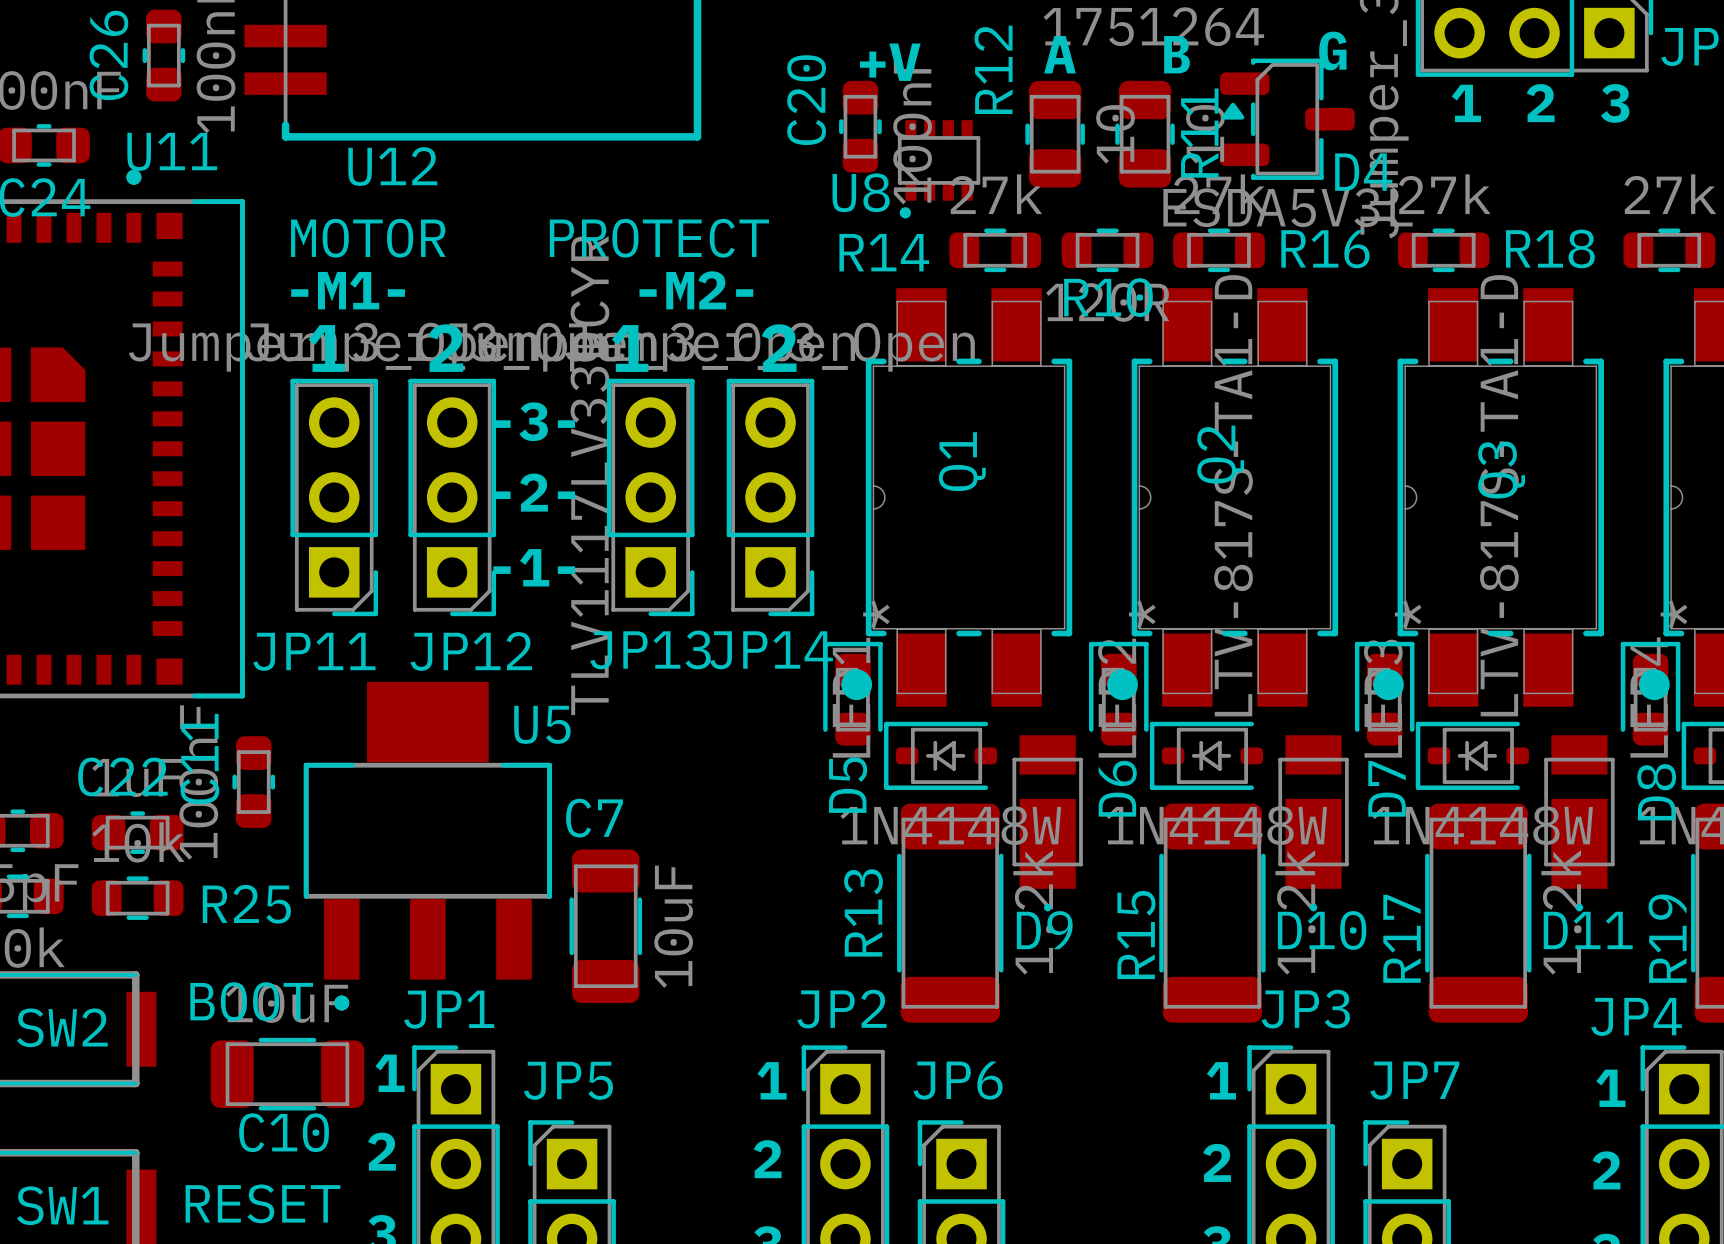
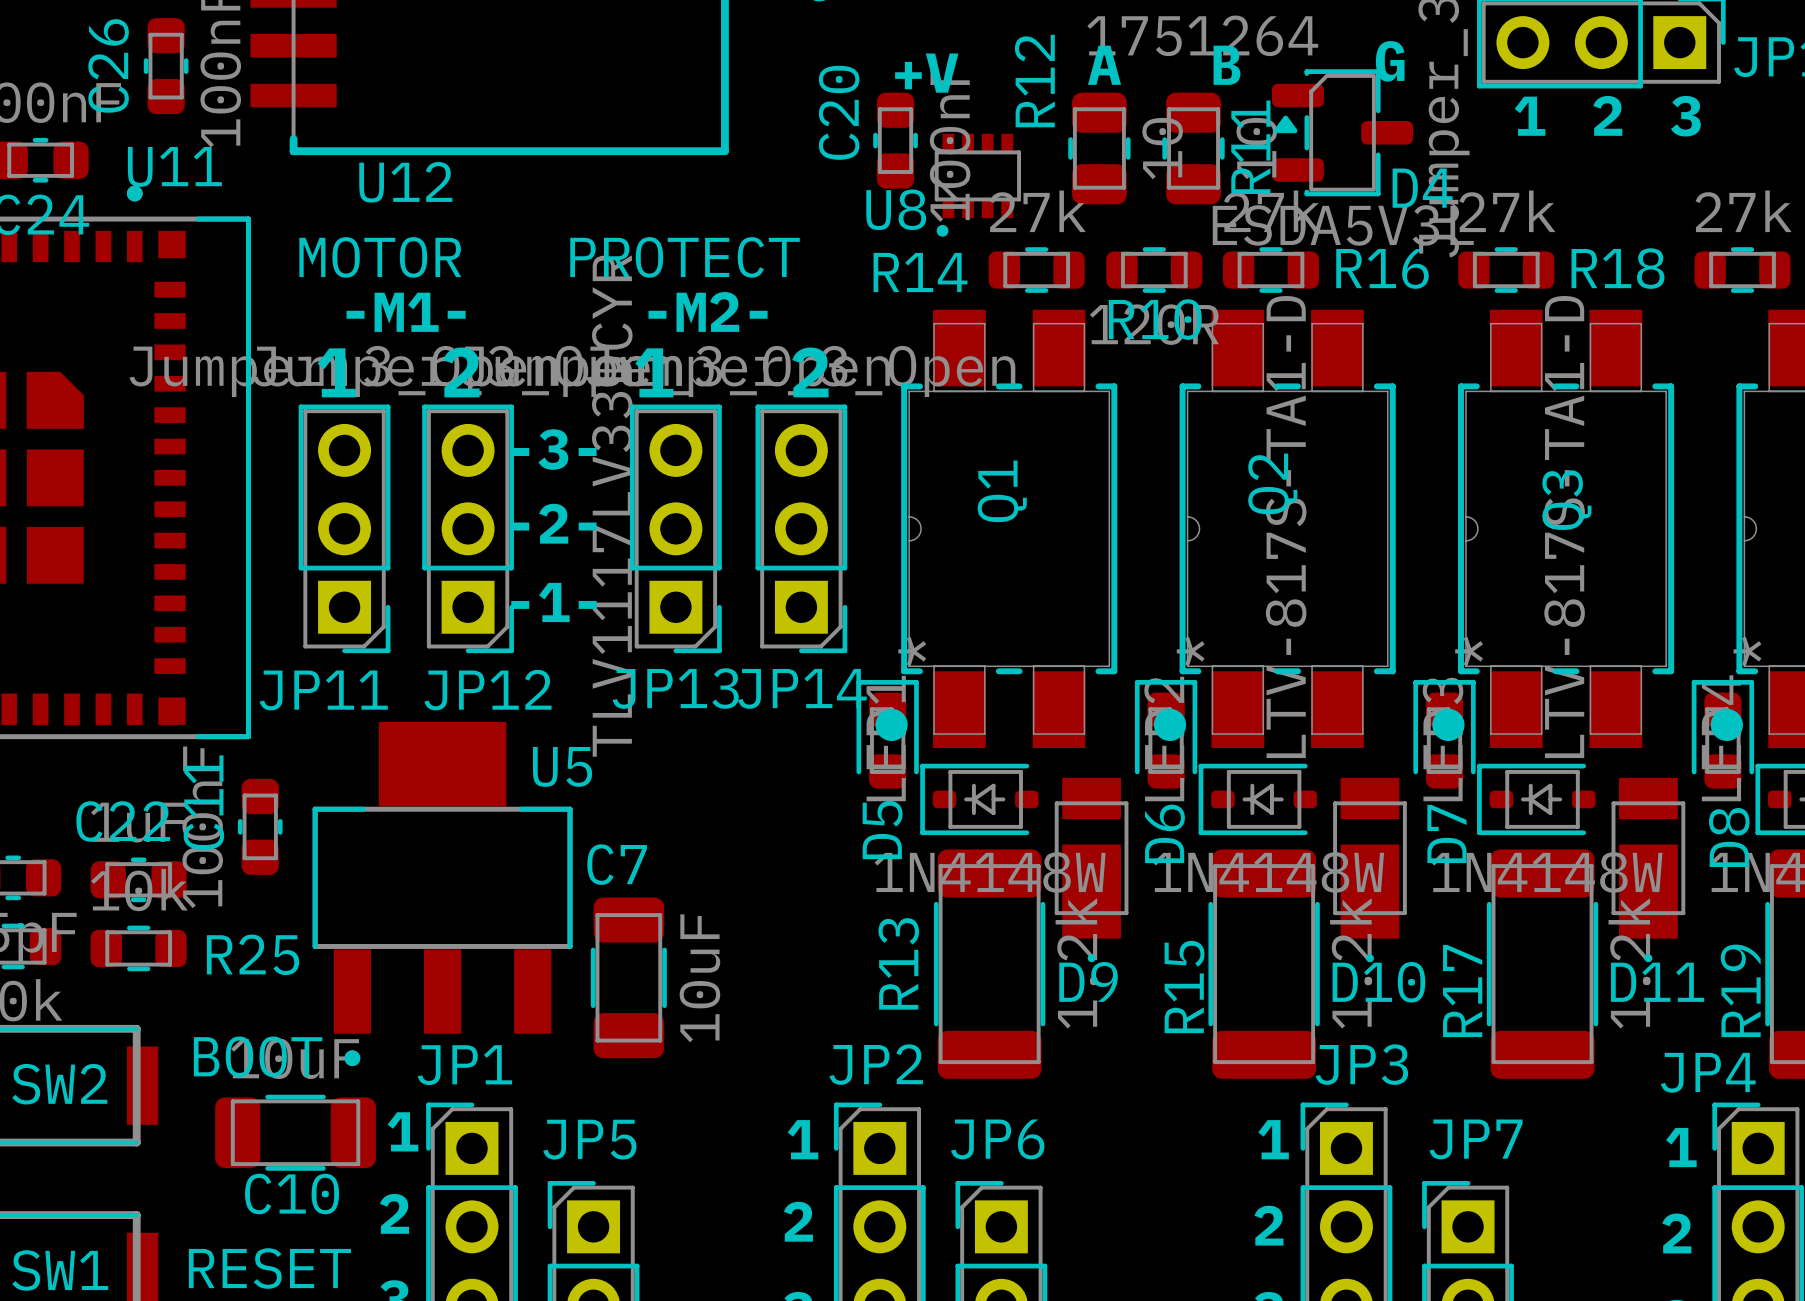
text position: -M1- (348, 290) -> -M1- (406, 312)
text position: -M2- (696, 290) -> -M2- (708, 311)

